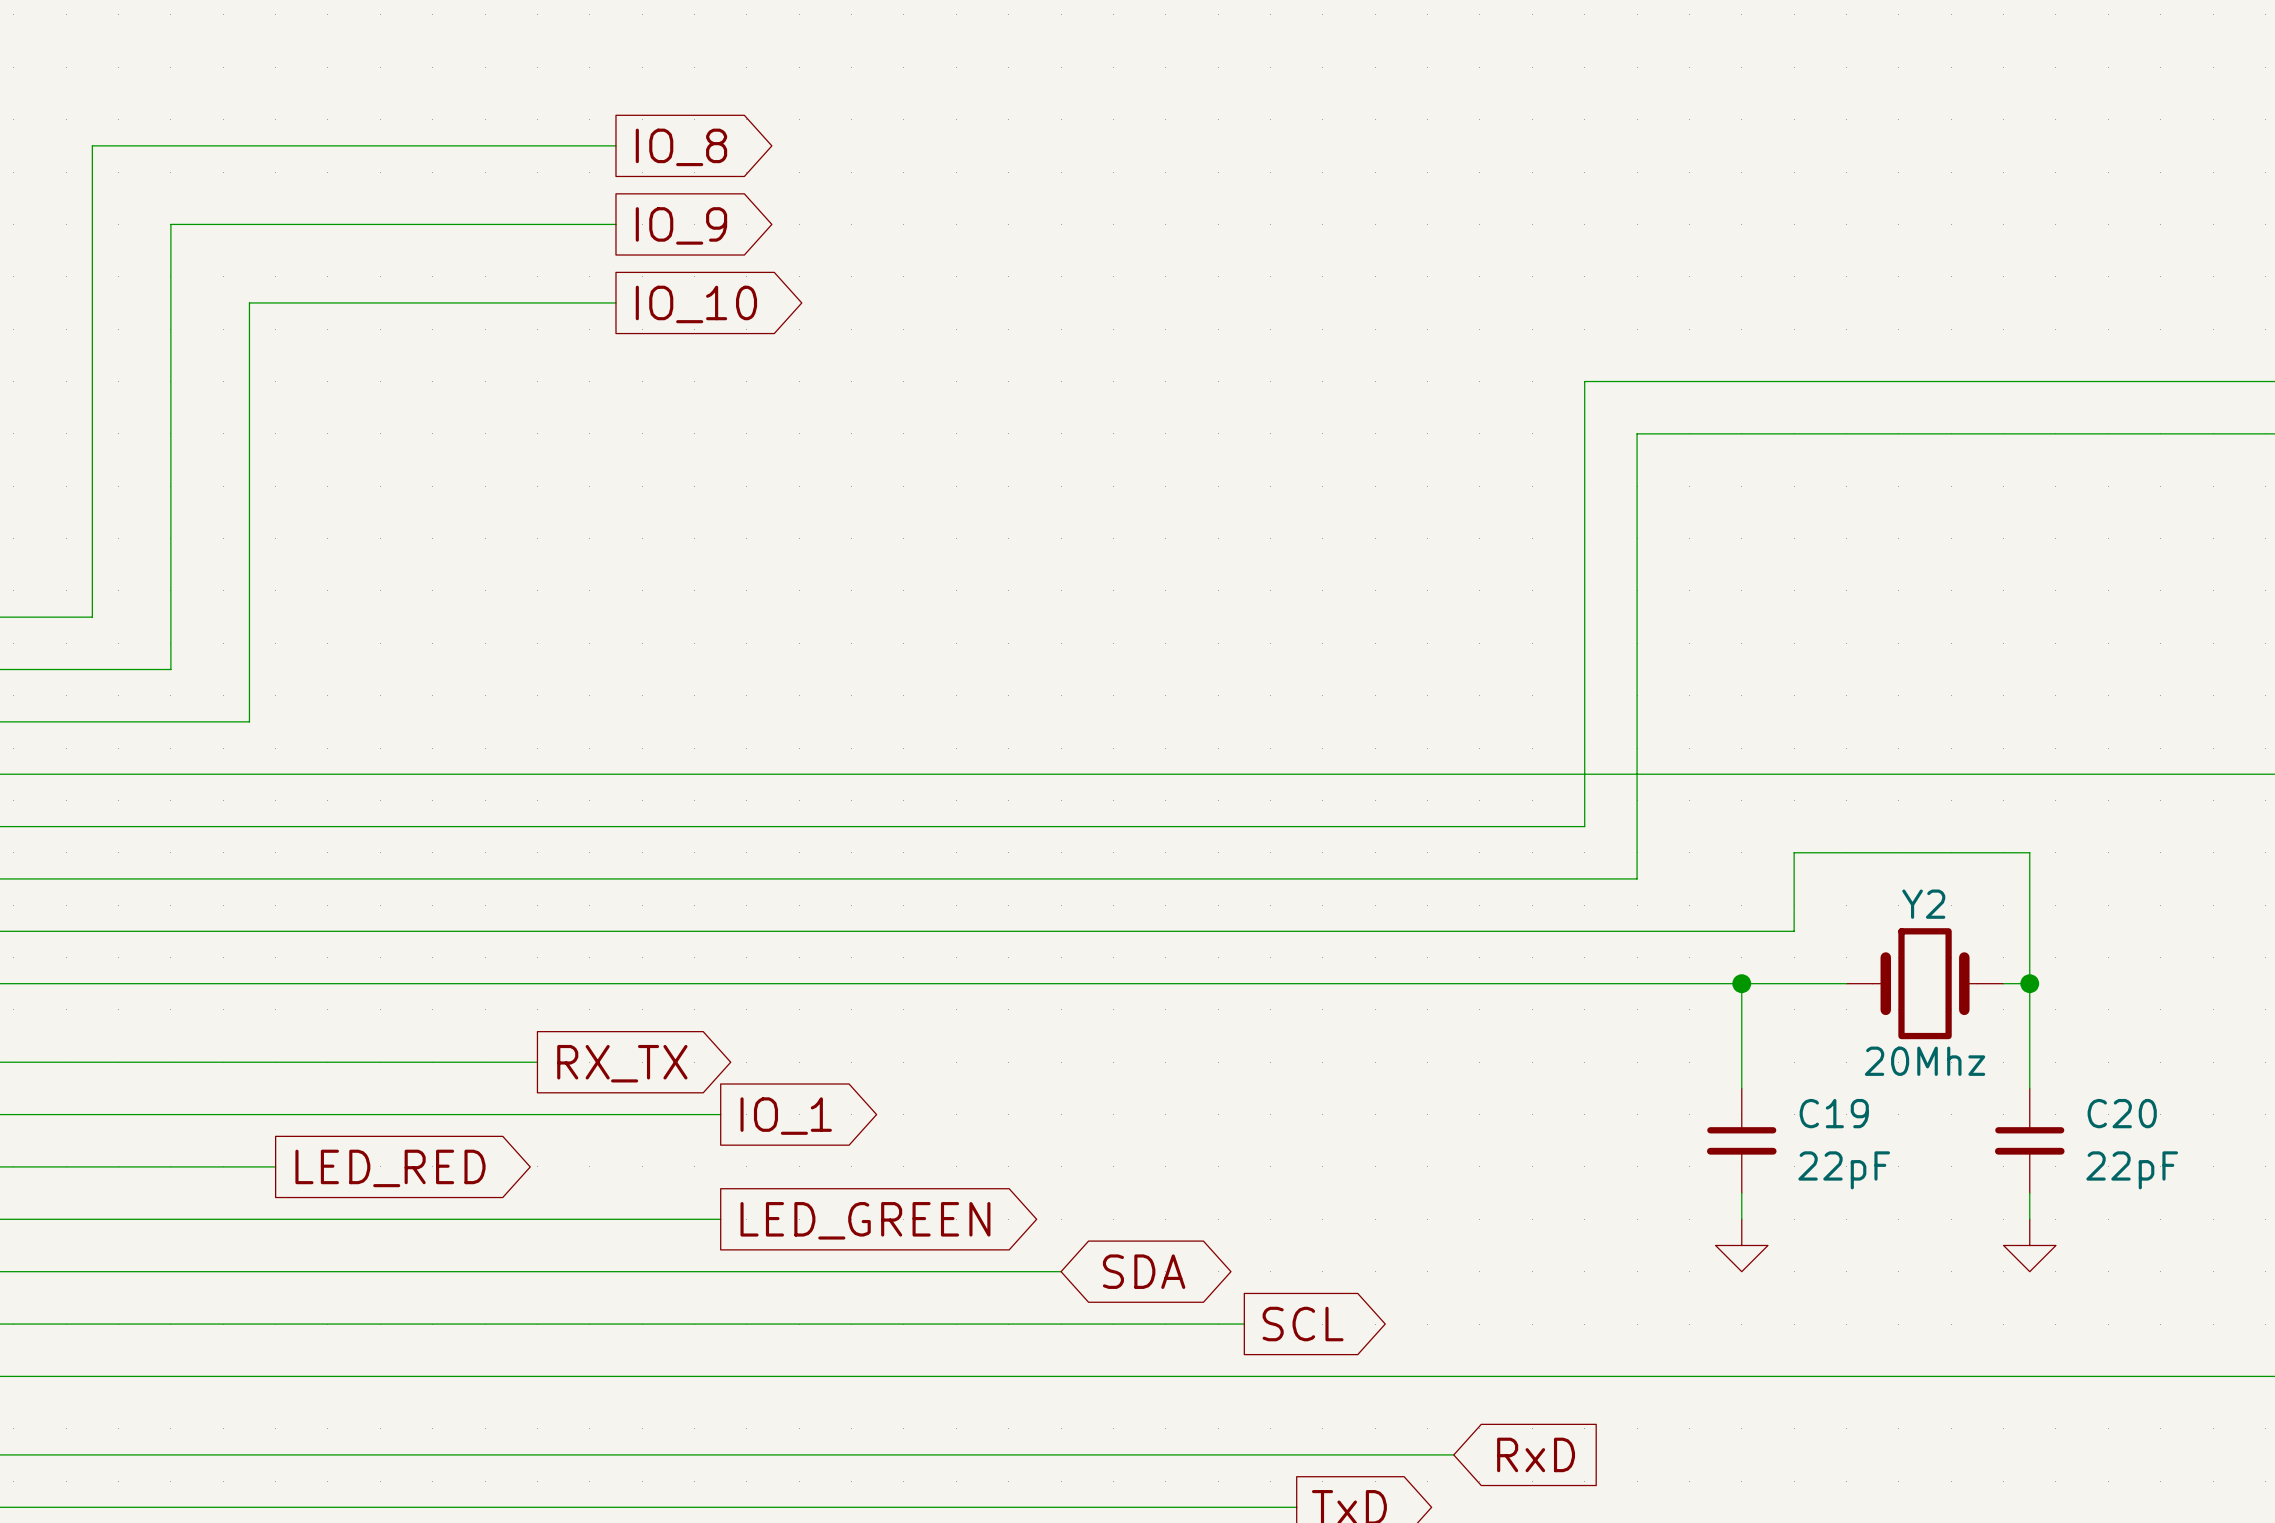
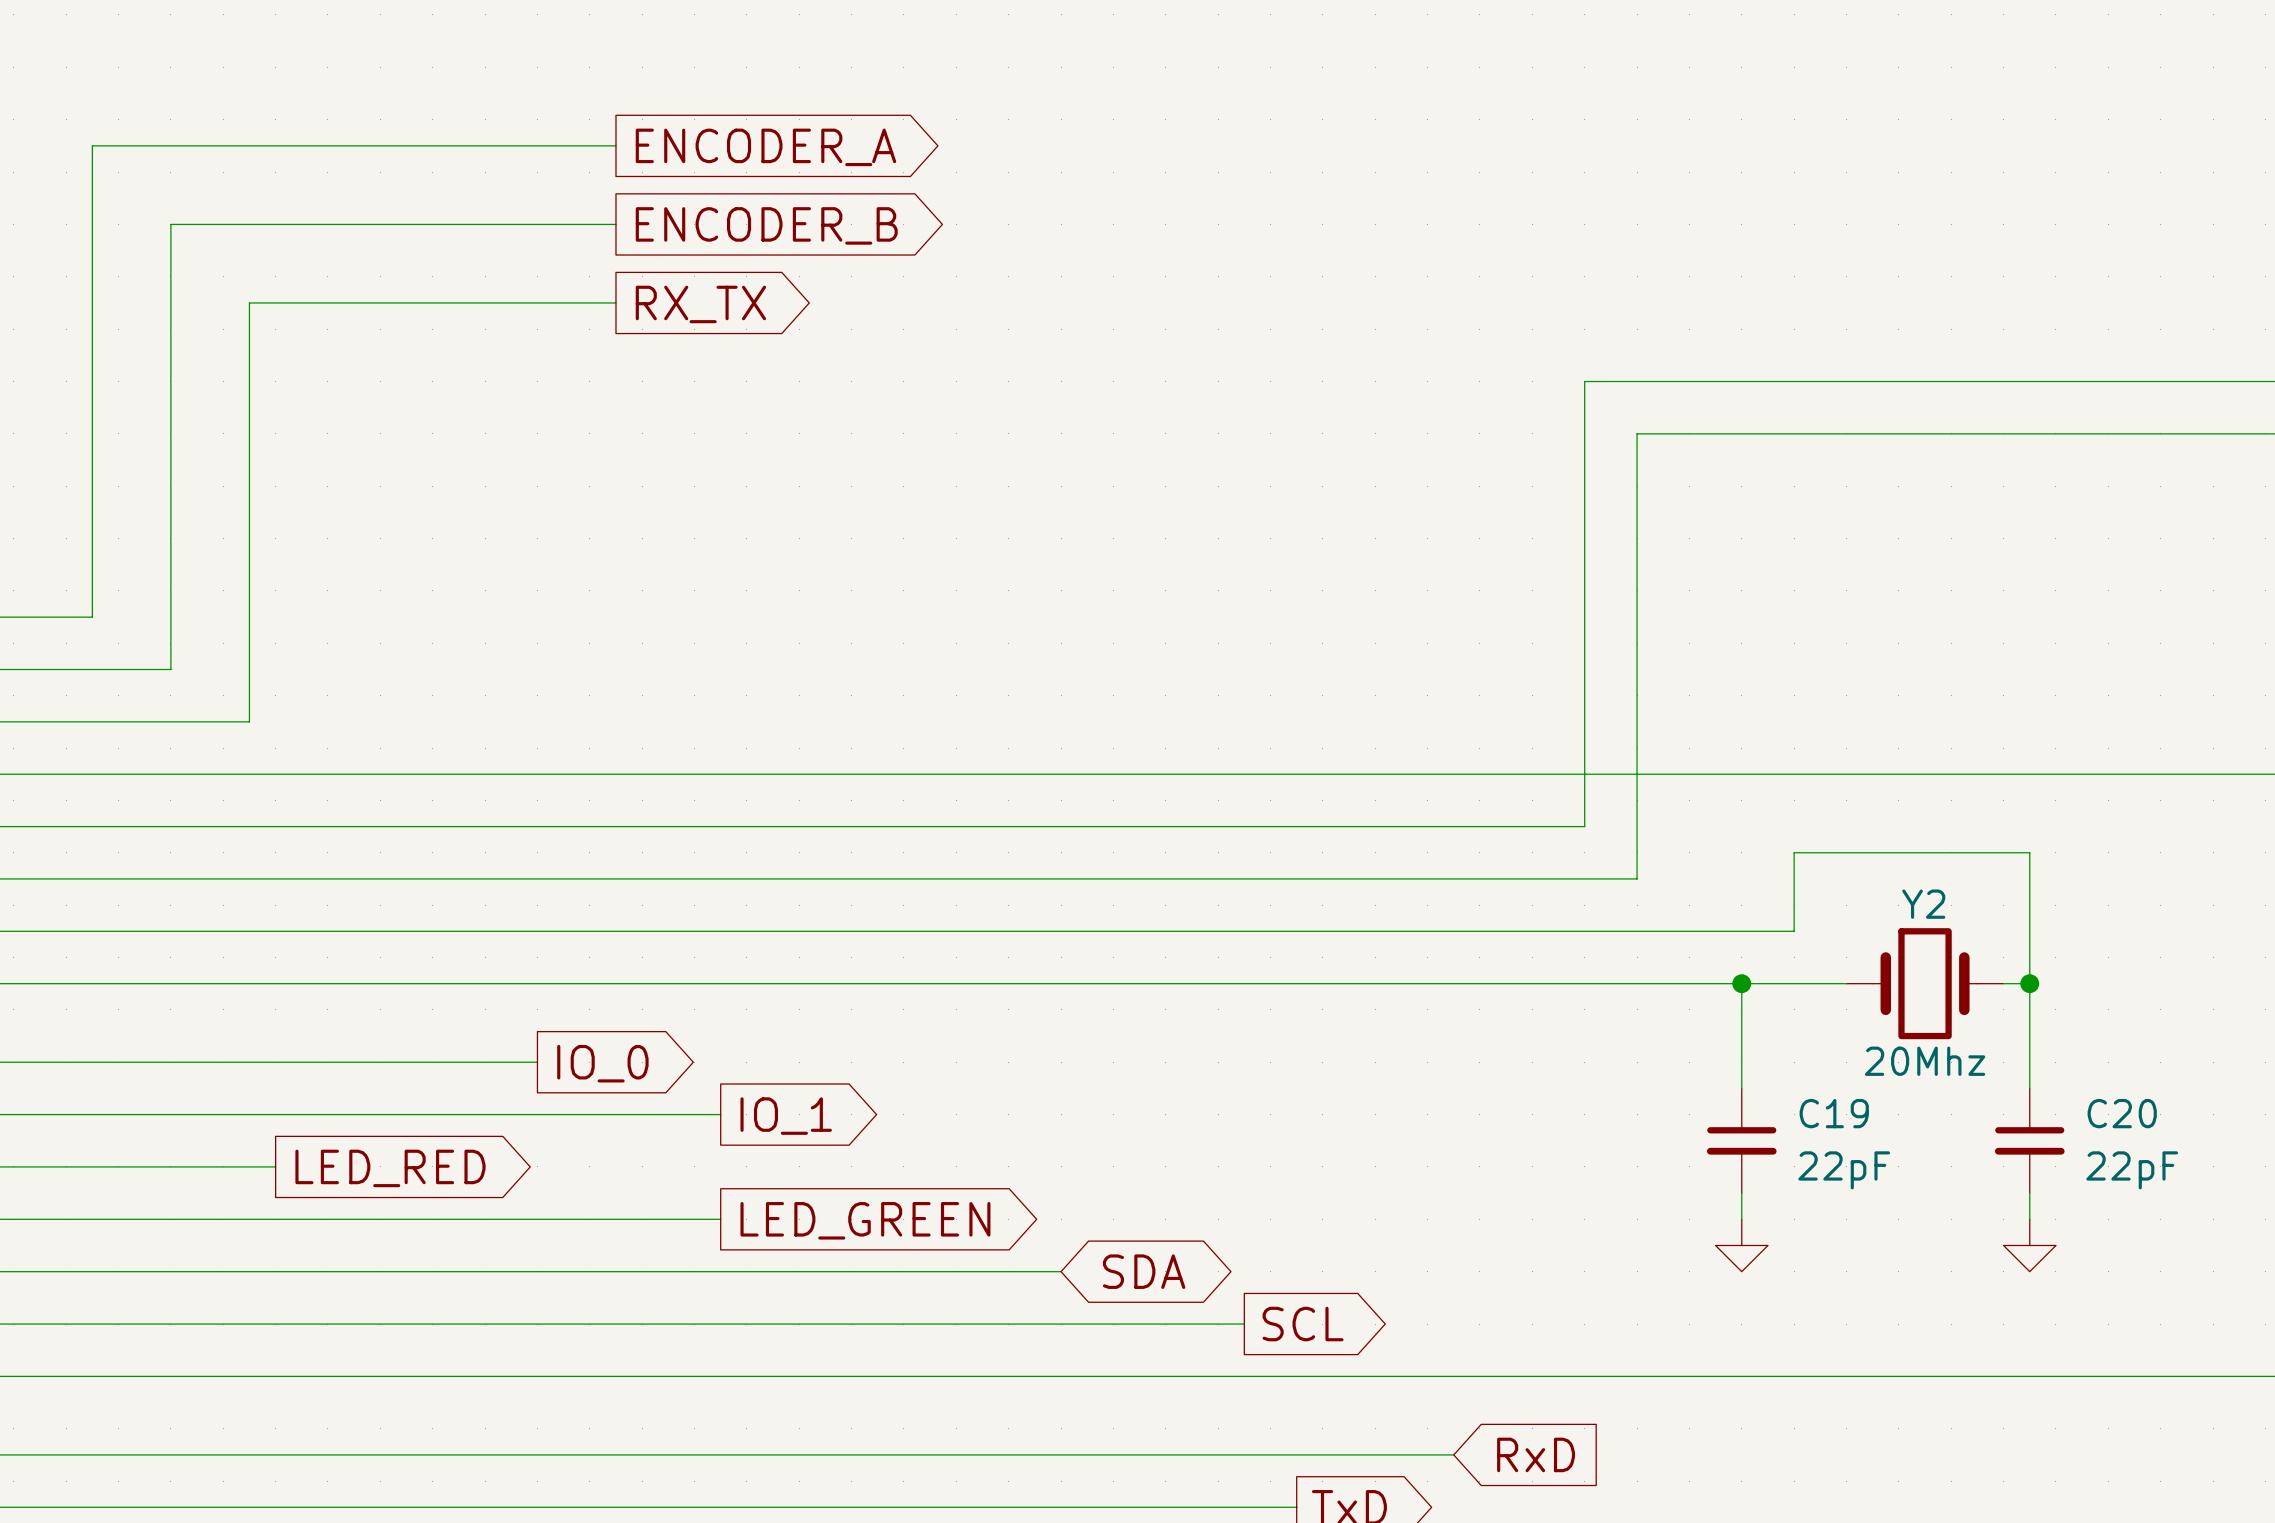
global label: IO_8 (681, 147) -> ENCODER_A (765, 147)
global label: IO_9 (681, 225) -> ENCODER_B (766, 225)
global label: IO_10 (696, 304) -> RX_TX (700, 304)
global label: RX_TX (622, 1063) -> IO_0 (602, 1063)

